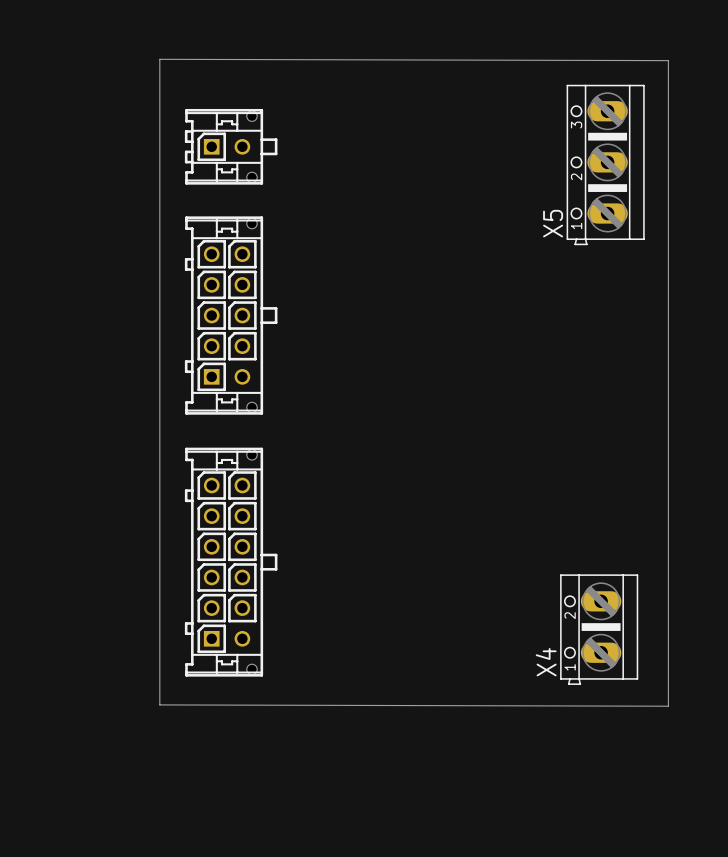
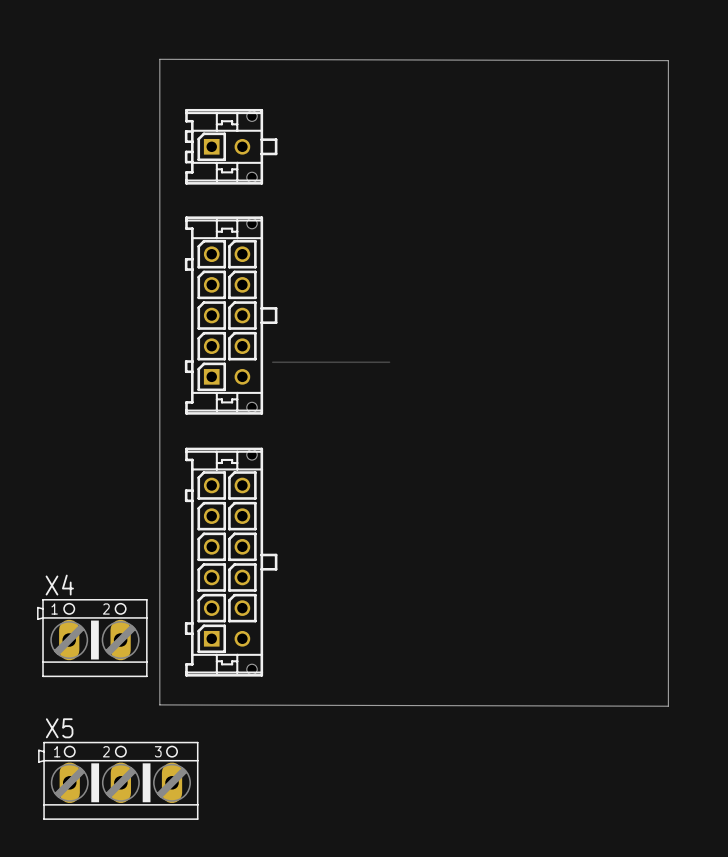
X5 rotation: 0° (605, 164) -> 90° clockwise (118, 780)
X5 position: (605, 164) -> (118, 780)
track: none -> (272, 362) (389, 362)
X4 rotation: 0° (599, 629) -> 90° clockwise (92, 638)
X4 position: (599, 629) -> (92, 638)

